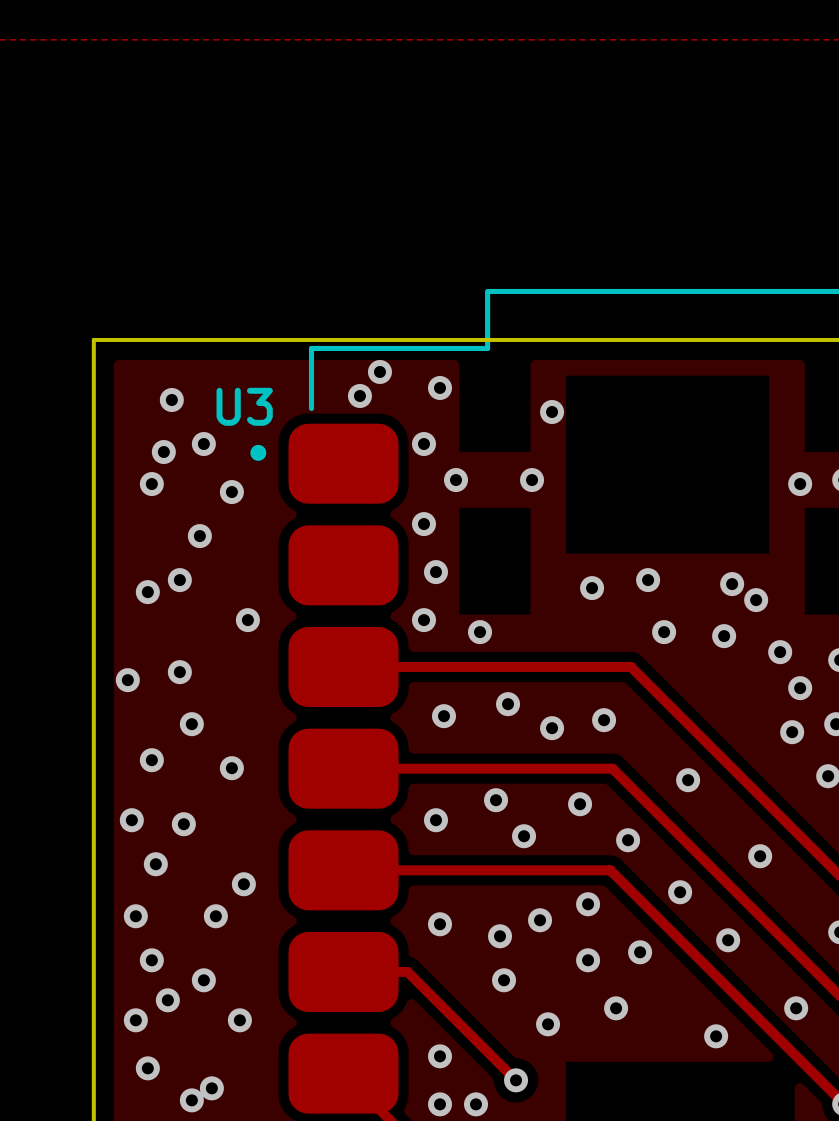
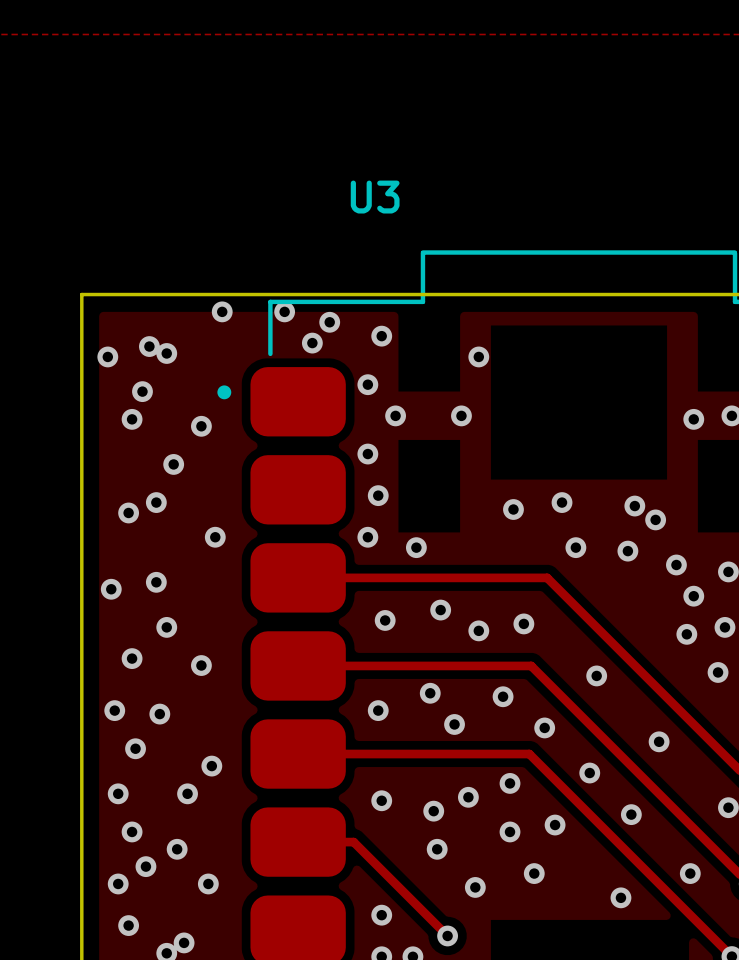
via: none -> (222, 311)
via: none -> (284, 311)
U3 name position: U3 (244, 406) -> U3 (375, 197)
via: none -> (107, 356)
via position: (203, 444) -> (166, 353)

